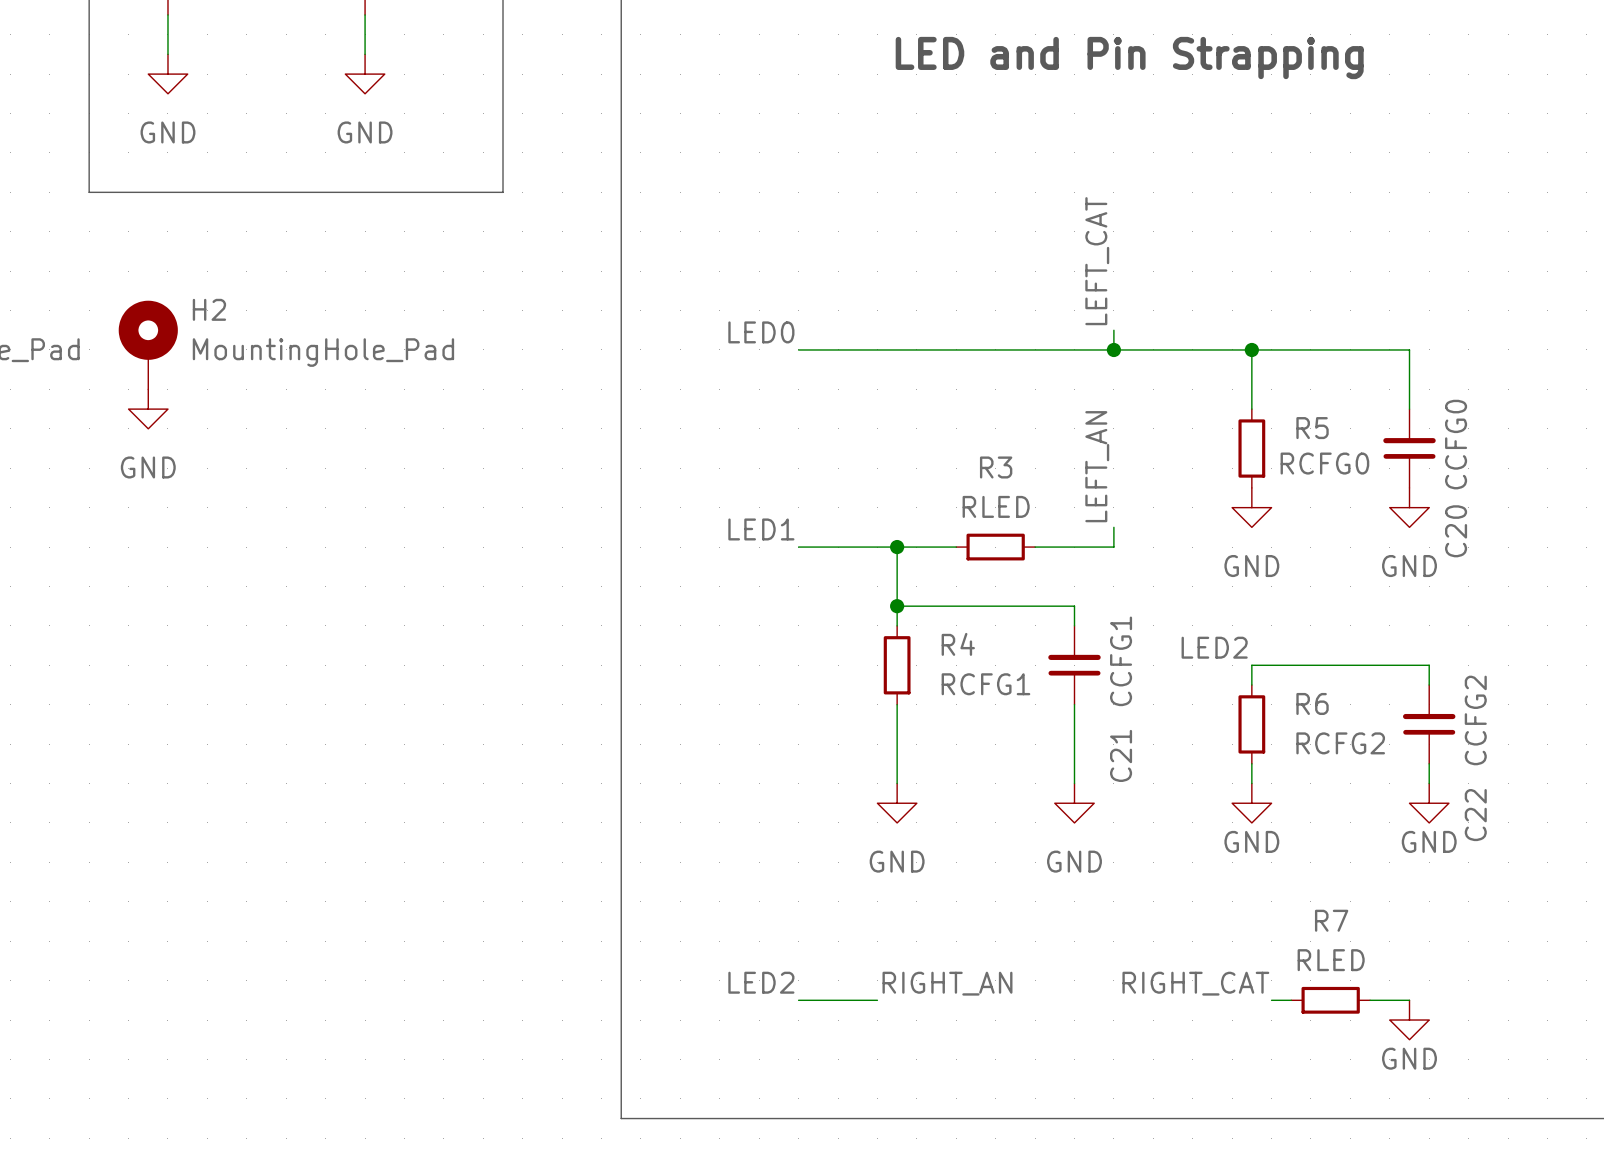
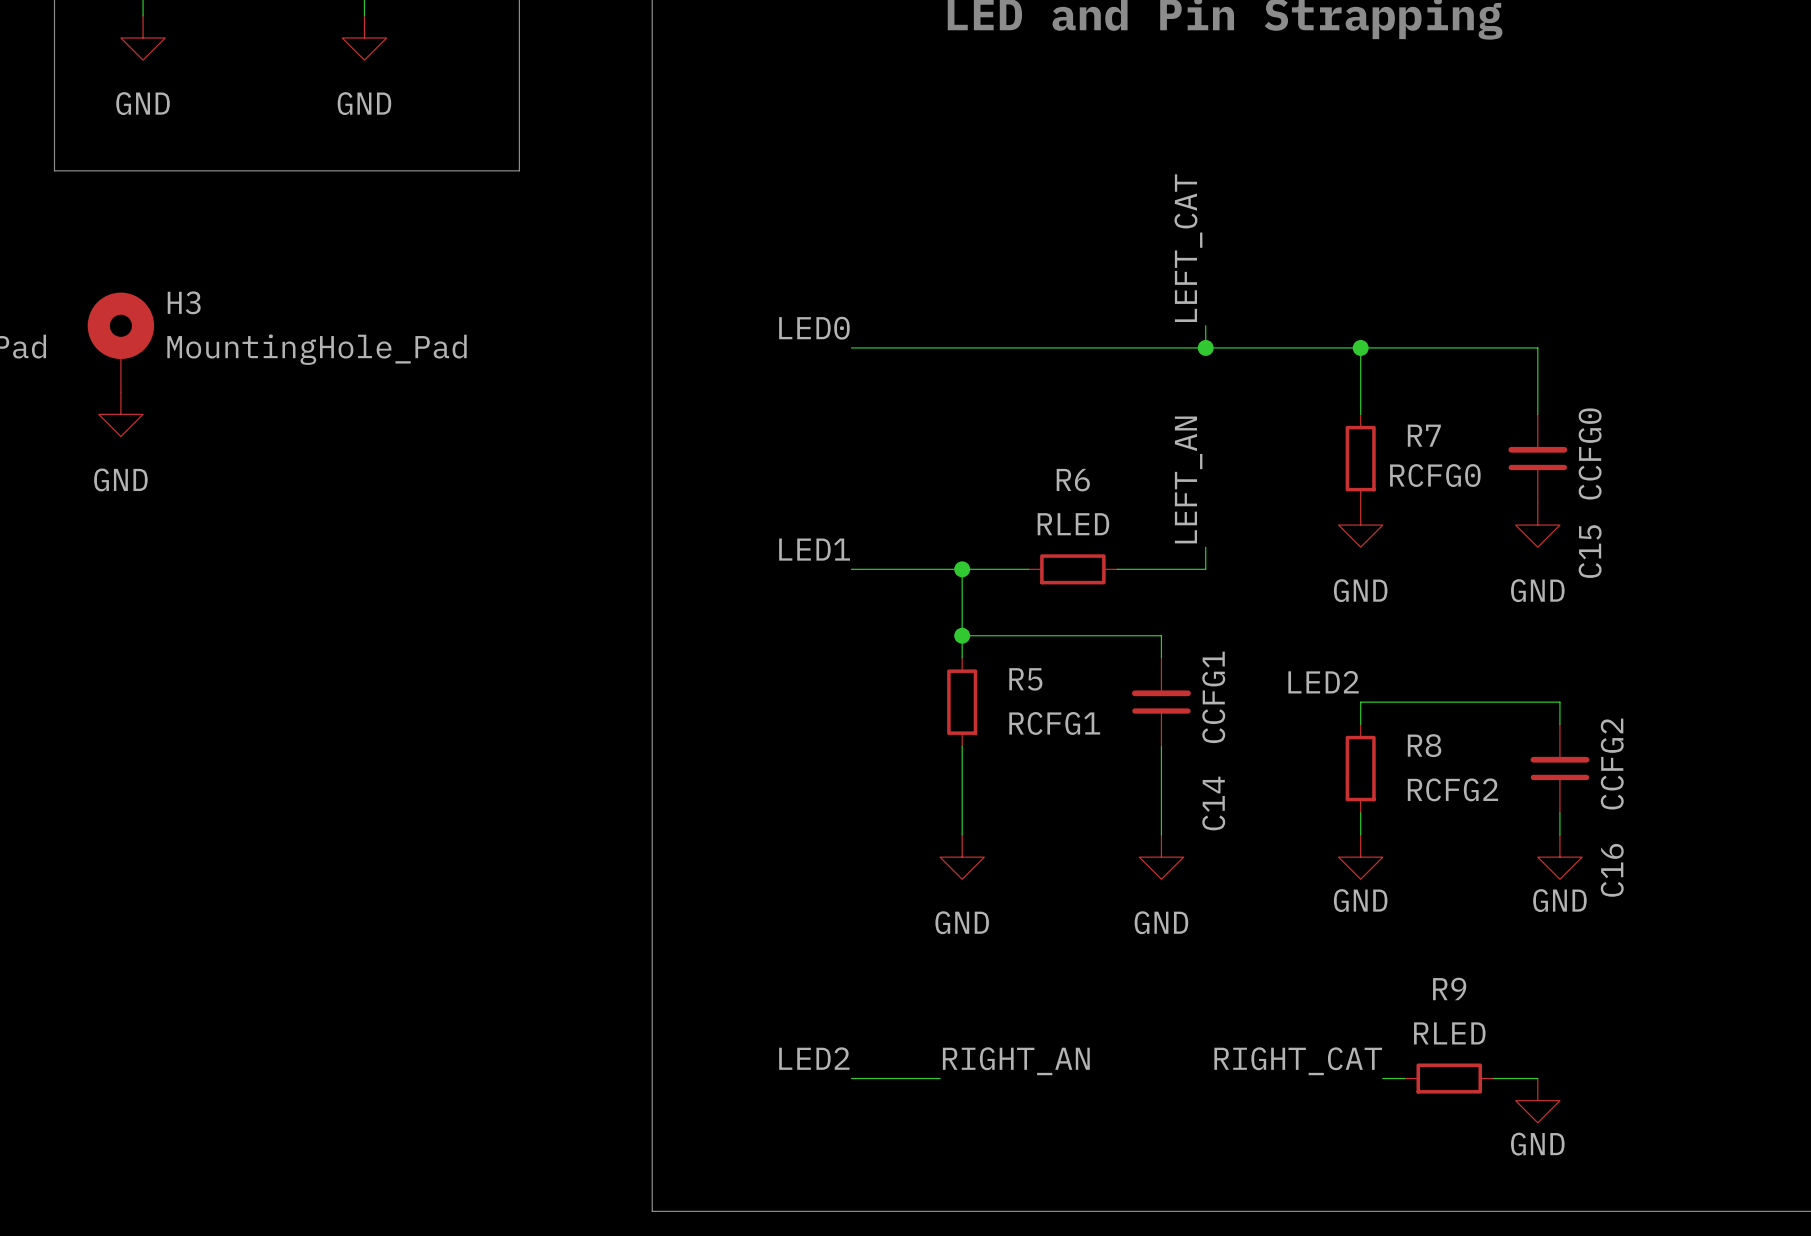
H2 name: H2 (209, 309) -> H3 (184, 302)
R5 name: R5 (1312, 428) -> R7 (1424, 435)
R3 name: R3 (996, 467) -> R6 (1073, 480)
C20 name: C20 (1456, 531) -> C15 (1590, 551)
R4 name: R4 (958, 644) -> R5 (1025, 679)
R6 name: R6 (1312, 703) -> R8 (1424, 745)
C21 name: C21 (1121, 755) -> C14 (1213, 803)
C22 name: C22 (1475, 815) -> C16 (1612, 870)
R7 name: R7 (1331, 920) -> R9 (1449, 988)

